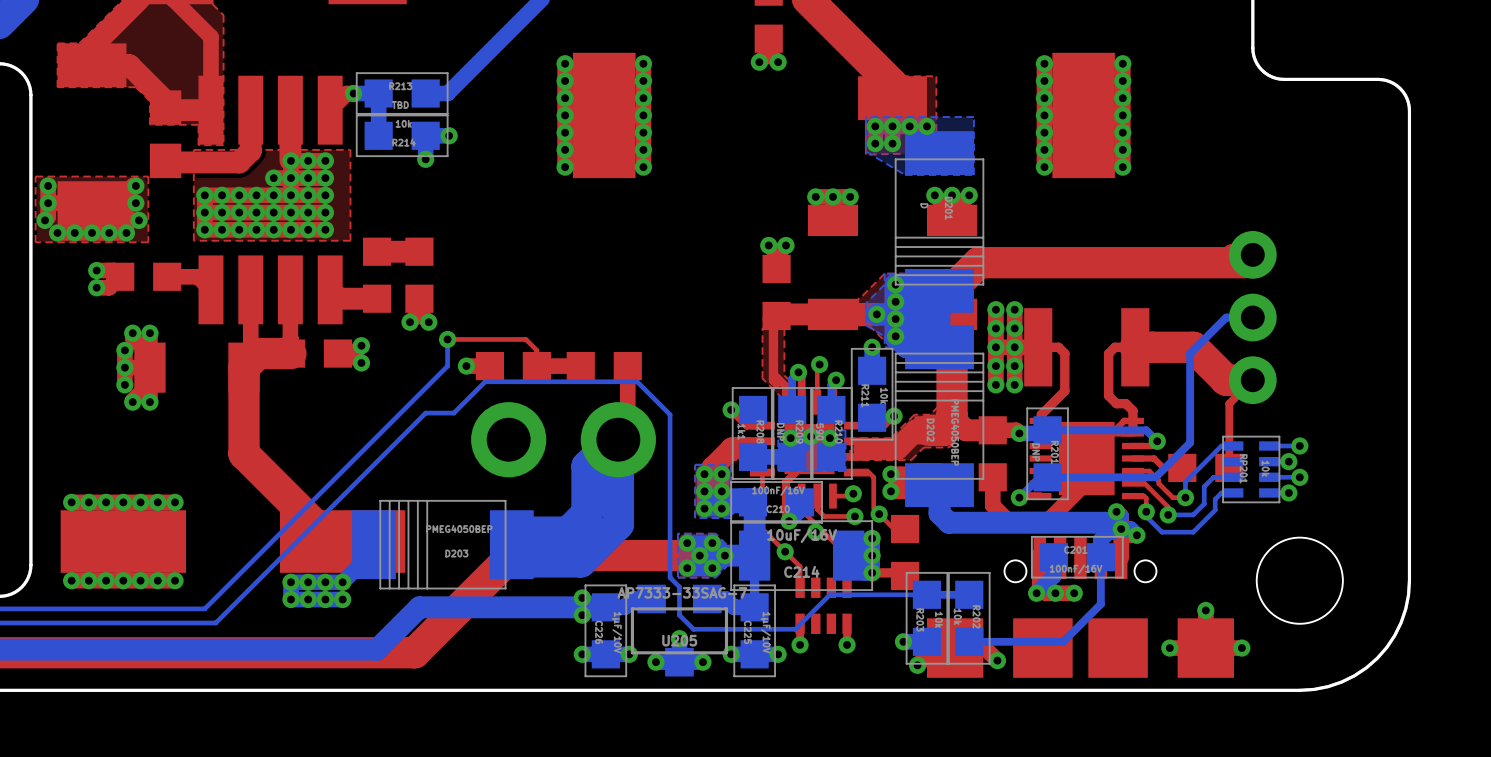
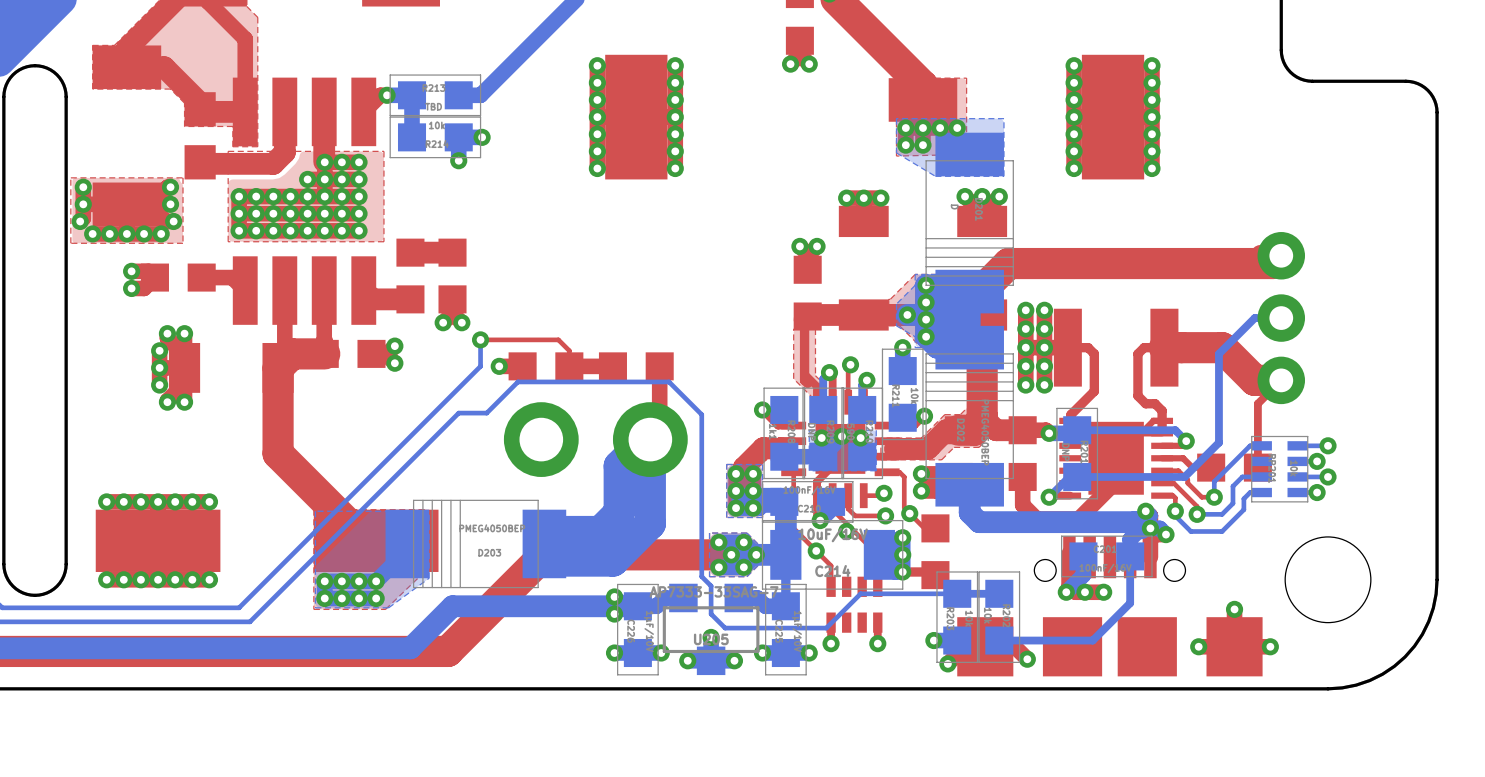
top zone outline: none -> (424, 509) (424, 571) (385, 609) (313, 609) (313, 509) (424, 509)
bottom zone outline: none -> (429, 511) (315, 511) (315, 607) (388, 607) (429, 578) (429, 511)

